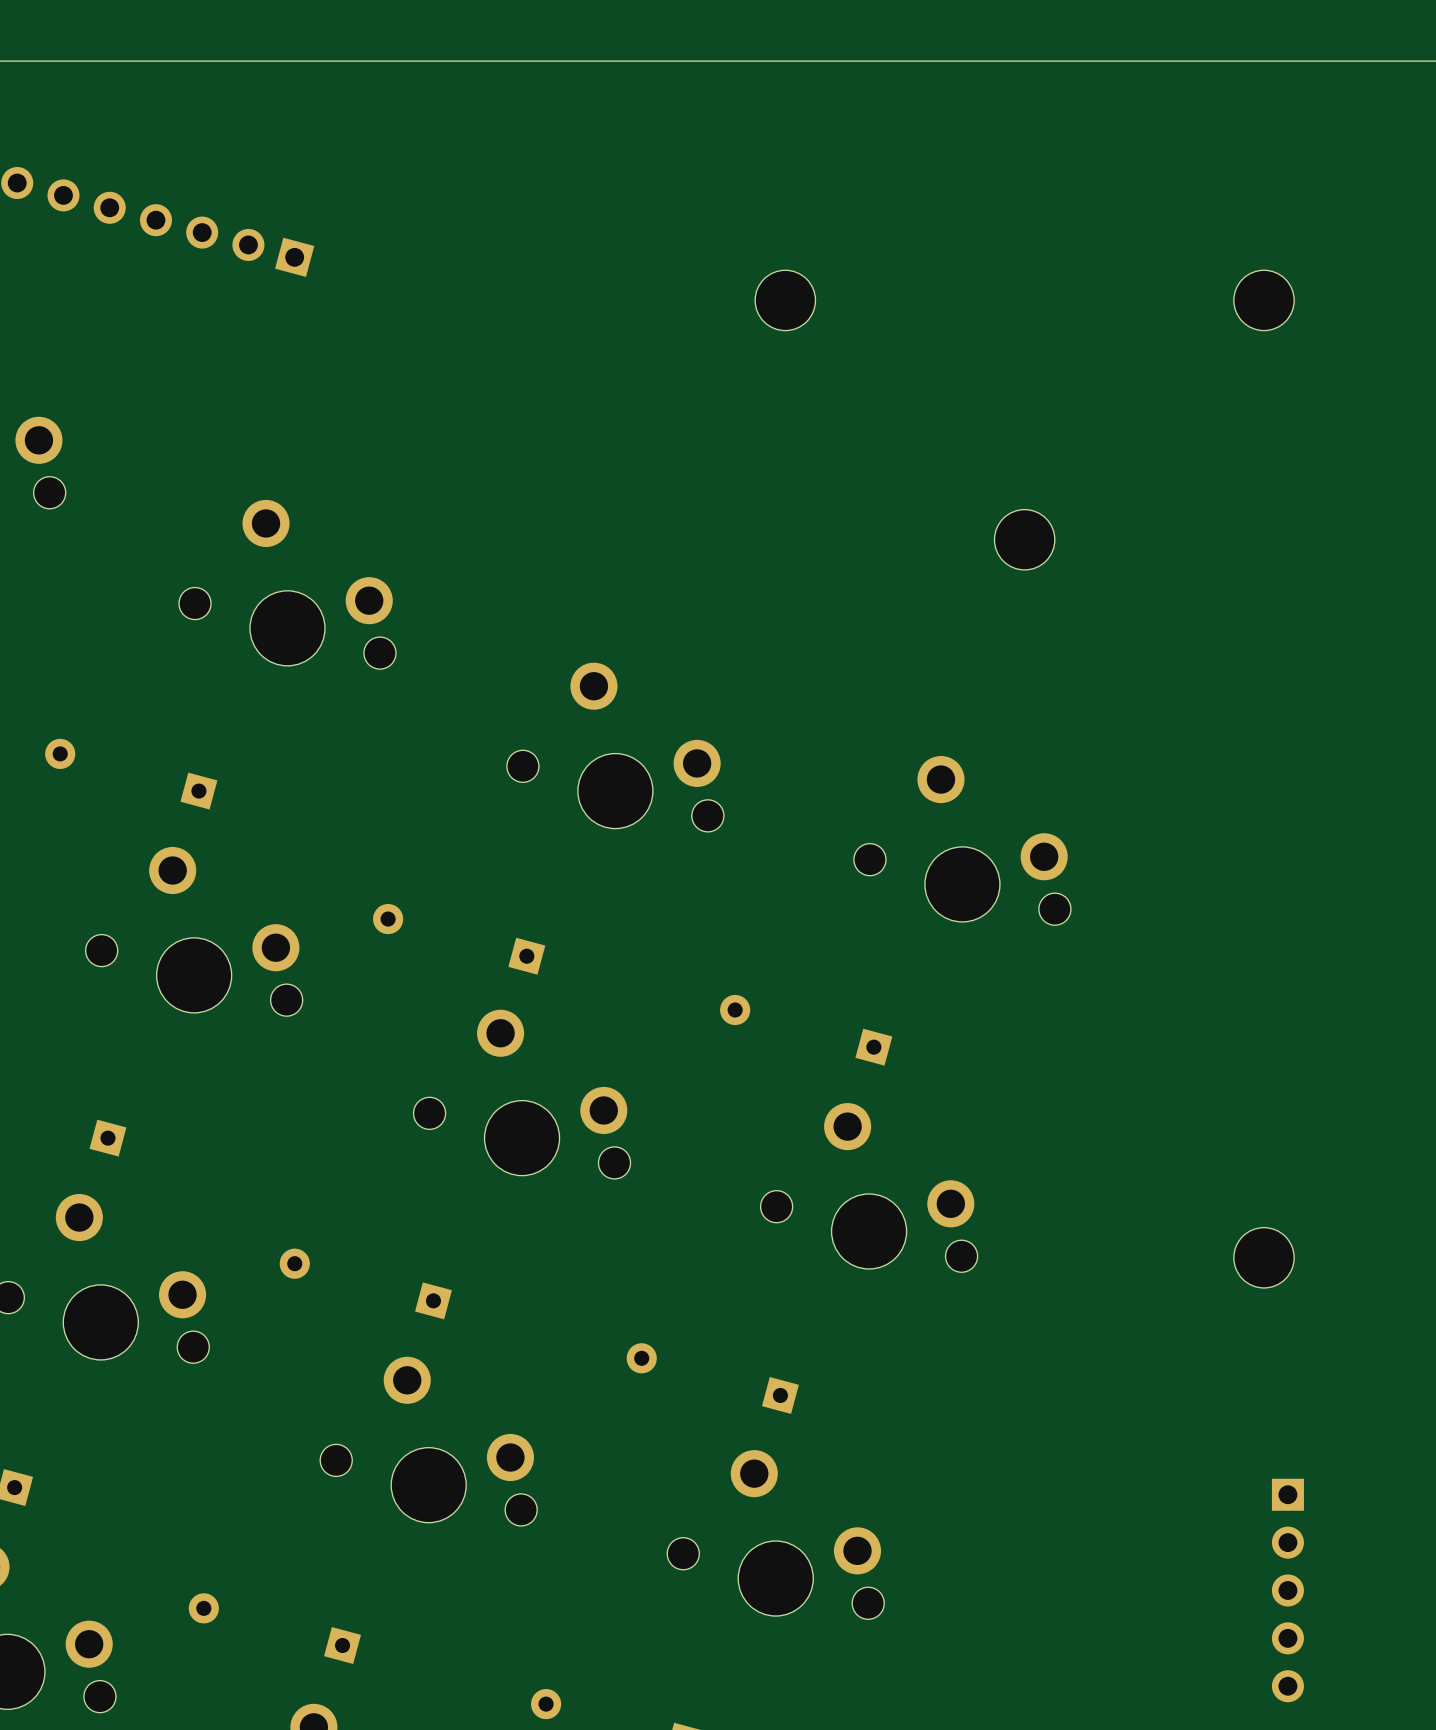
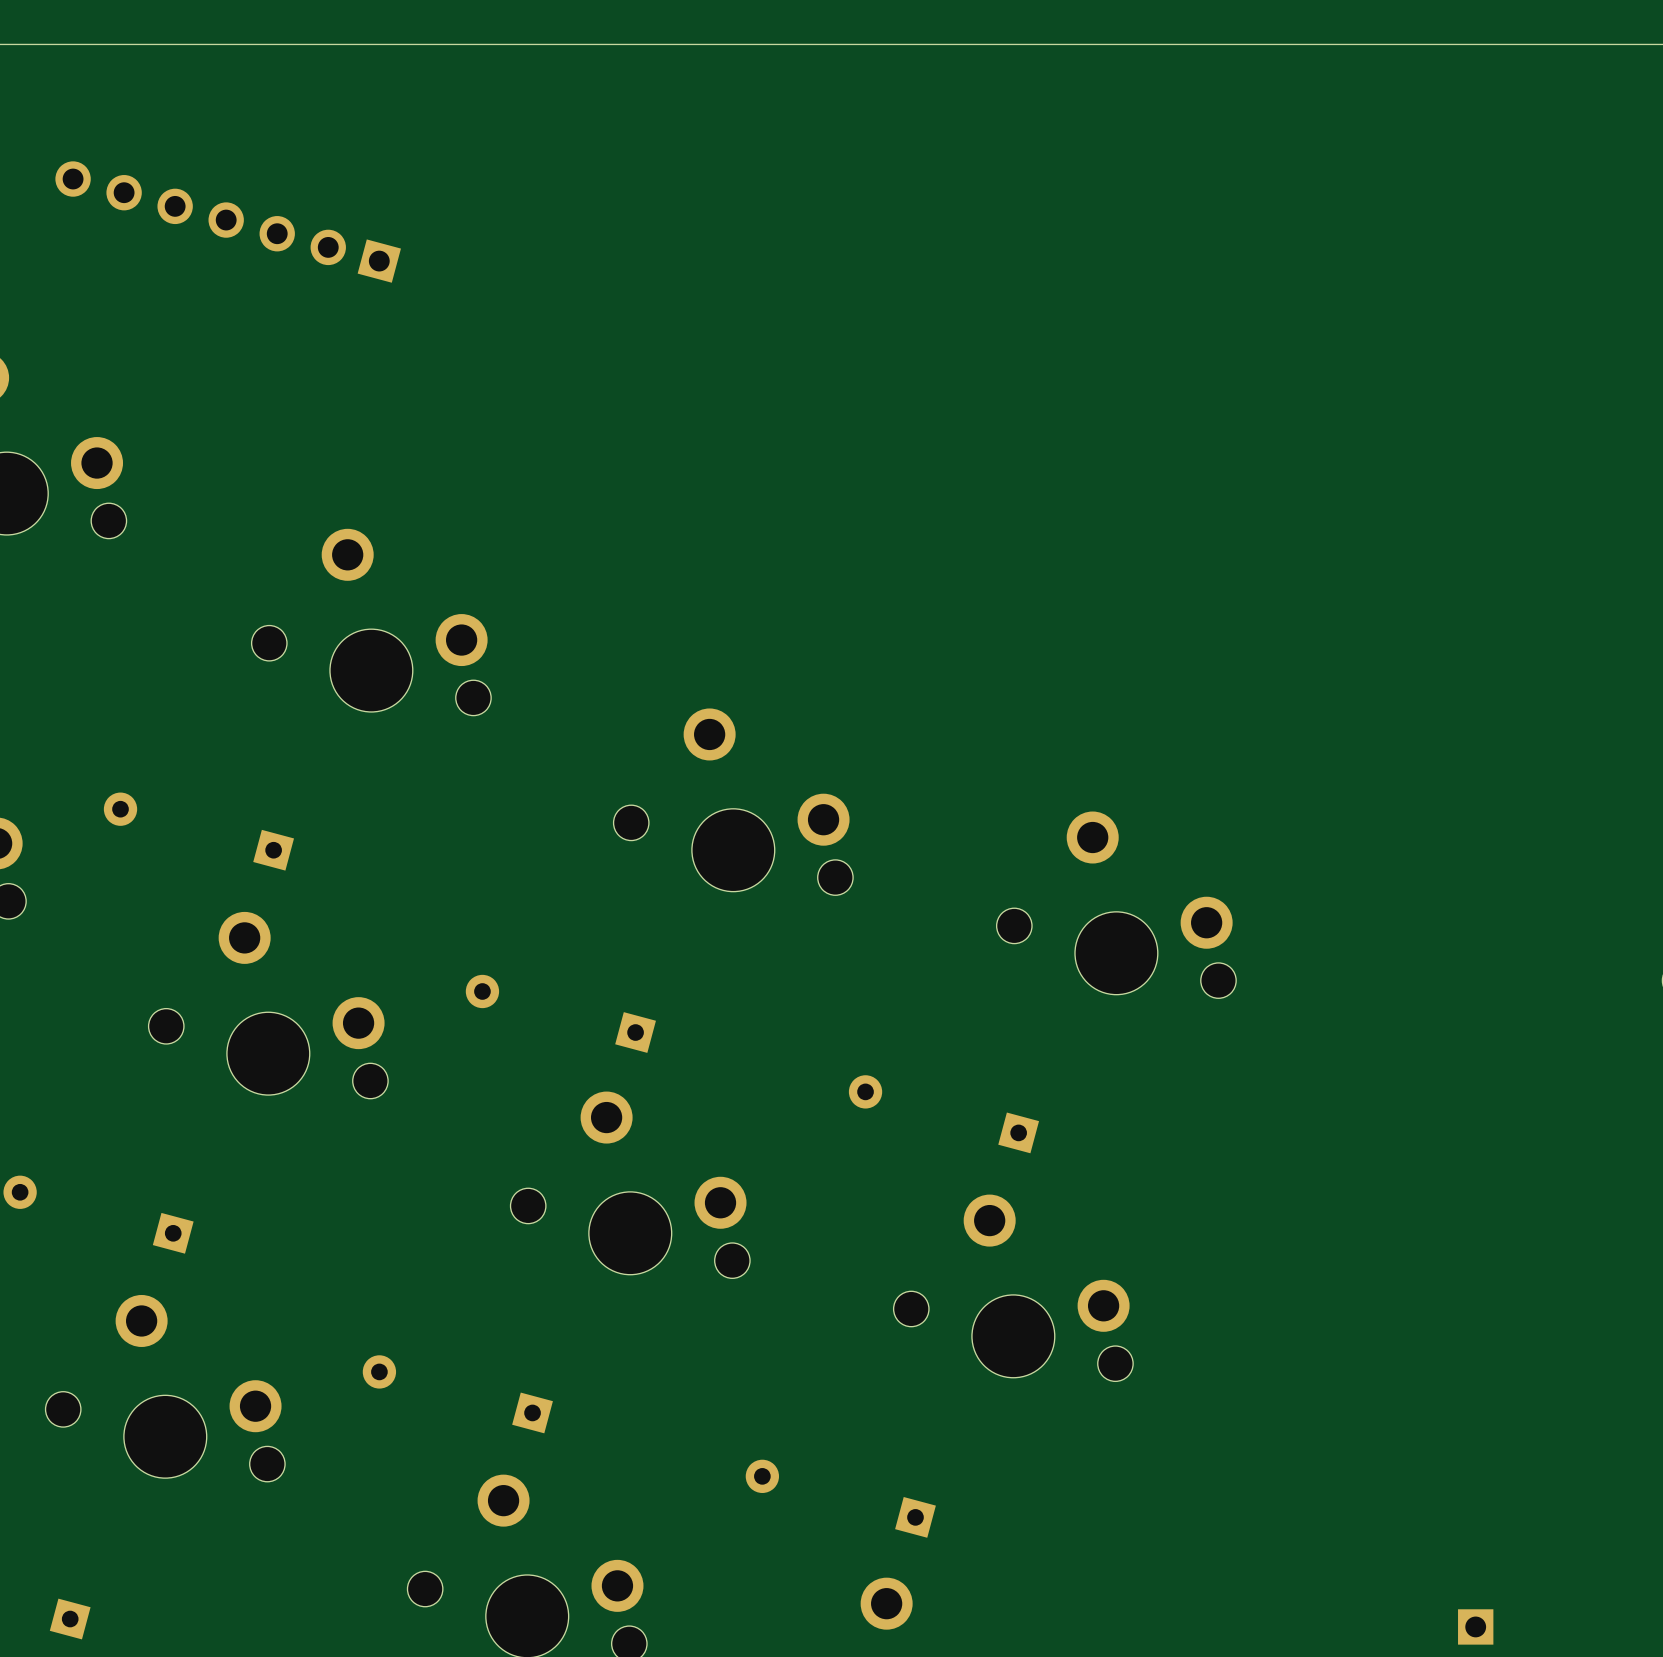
part: (785, 300) -> none
part: (1264, 300) -> none
part: (1024, 539) -> none
part: (1264, 1257) -> none

